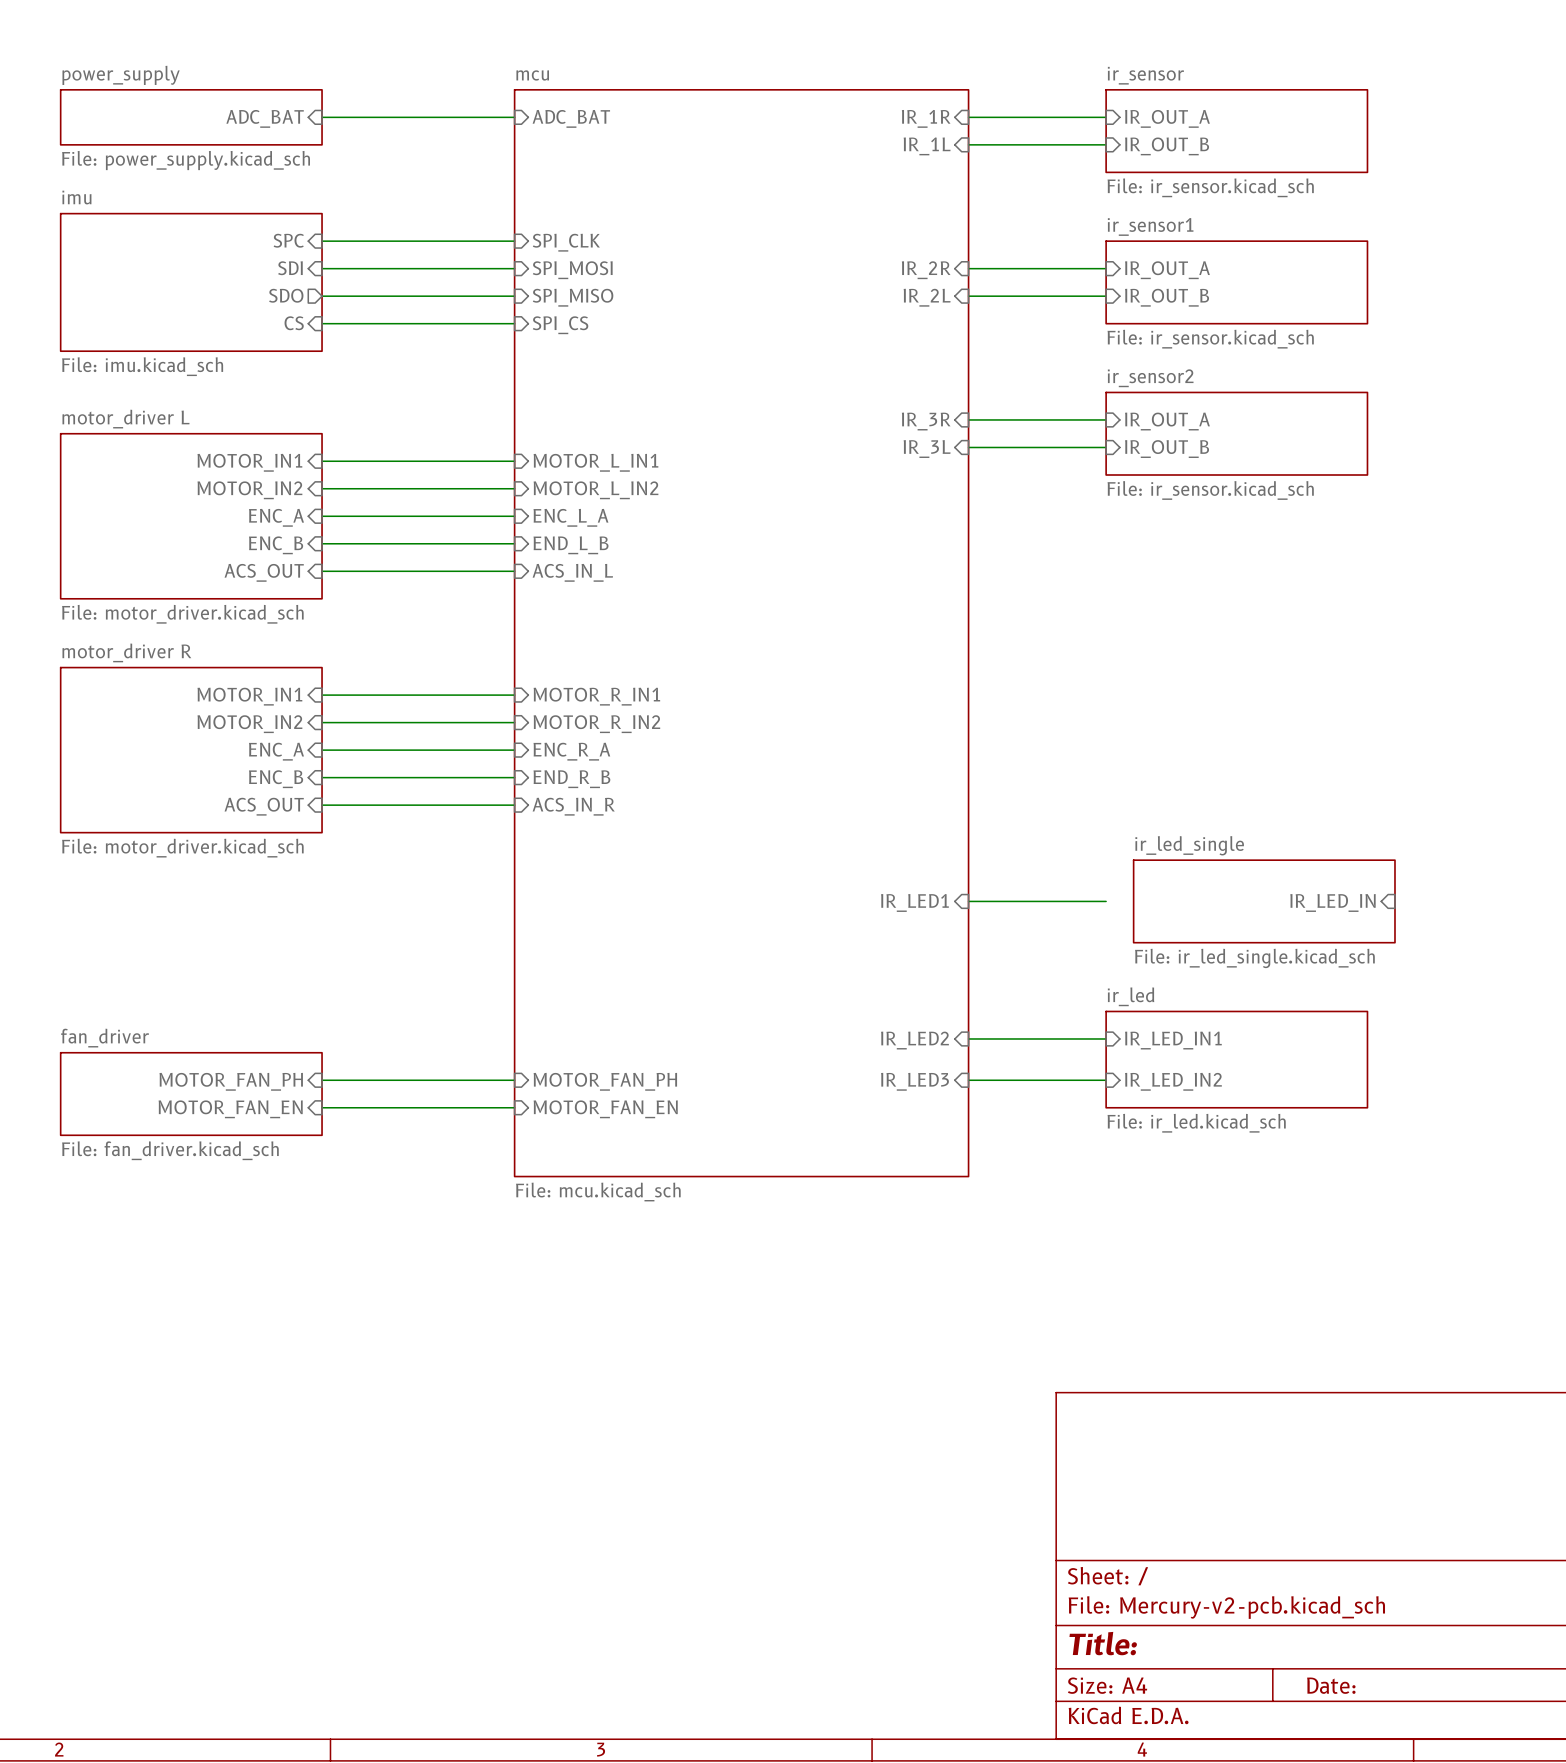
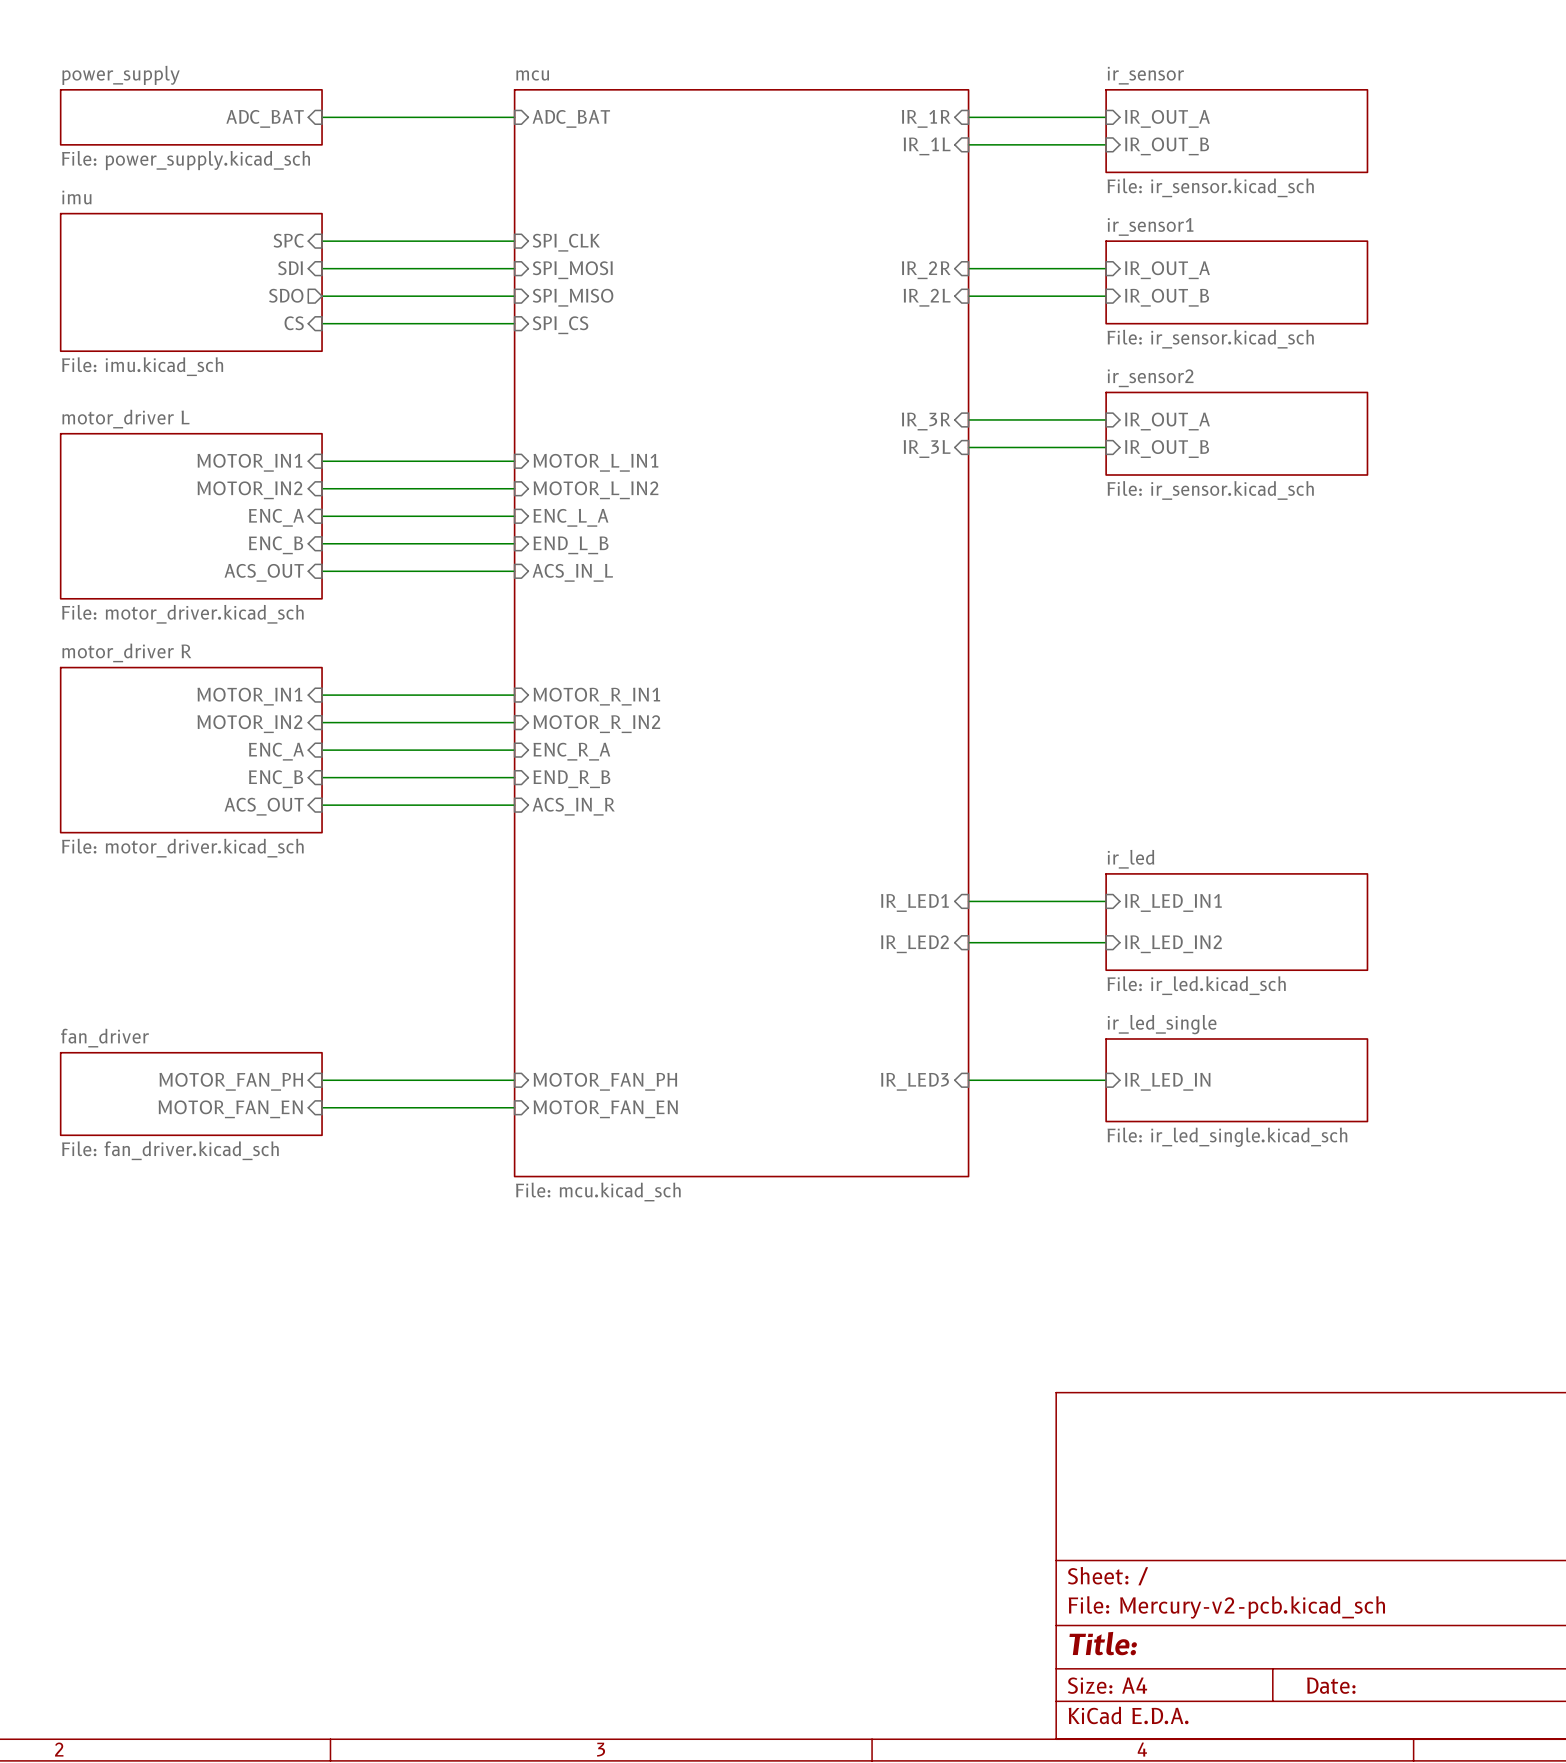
sheet ir_led_single position: (1264, 901) -> (1236, 1080)
sheet pin: IR_LED_IN (1332, 902) -> none
sheet pin: none -> IR_LED_IN2 (1173, 944)
wire: (968, 1038) (1106, 1038) -> (968, 942) (1106, 942)
sheet pin position: IR_LED2 (914, 1040) -> IR_LED2 (914, 944)
sheet pin position: IR_LED_IN1 (1173, 1040) -> IR_LED_IN1 (1173, 902)
sheet ir_led position: (1236, 1059) -> (1236, 922)
sheet pin: IR_LED_IN2 (1173, 1081) -> IR_LED_IN (1167, 1081)

